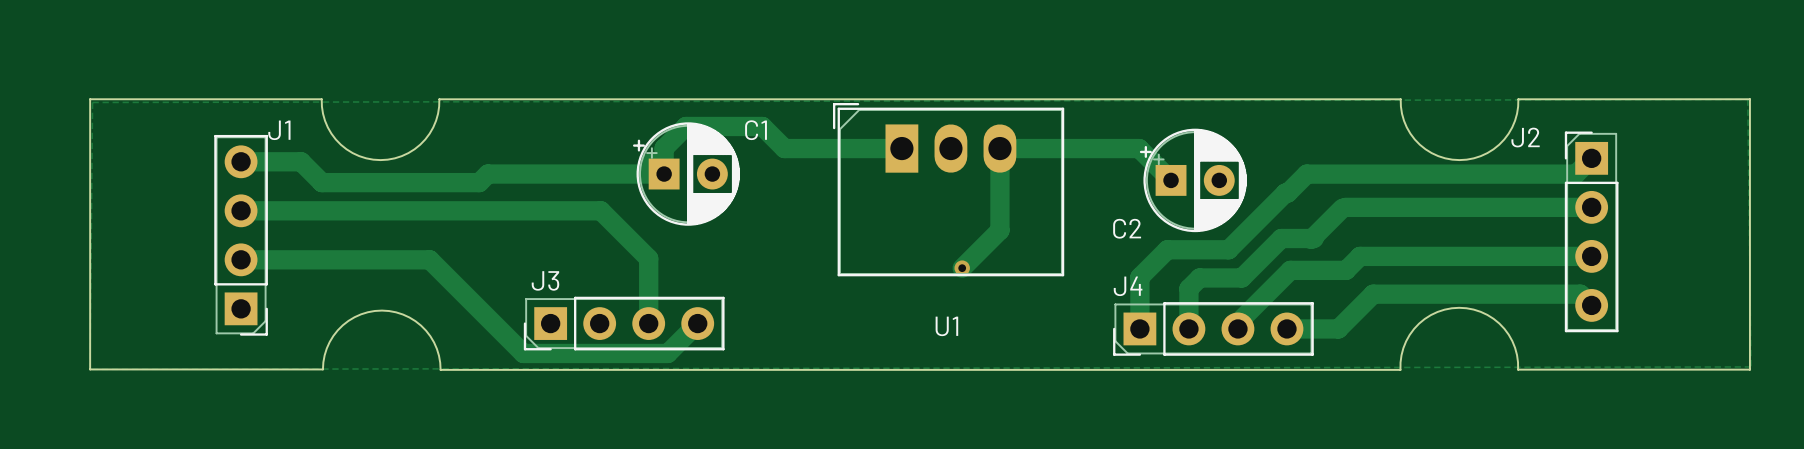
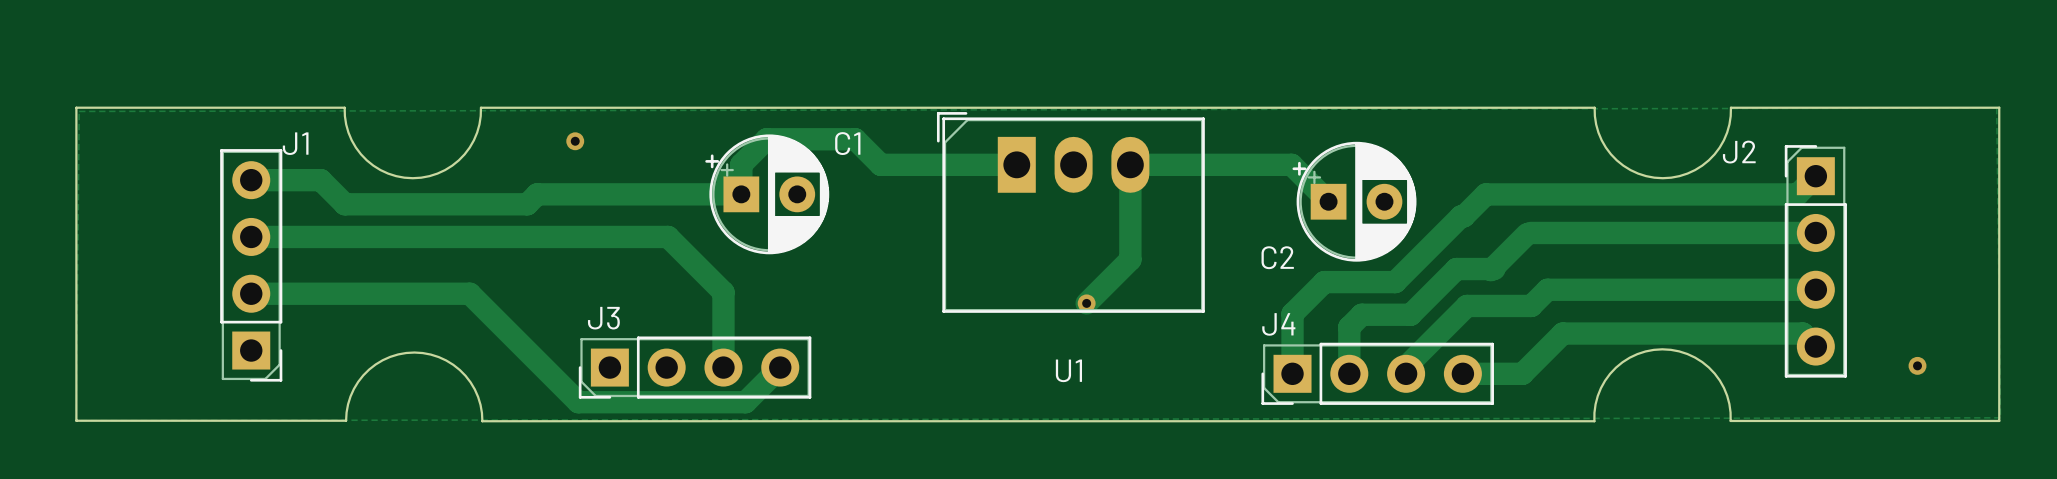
via: none -> (575, 141)
via: none -> (1917, 365)

